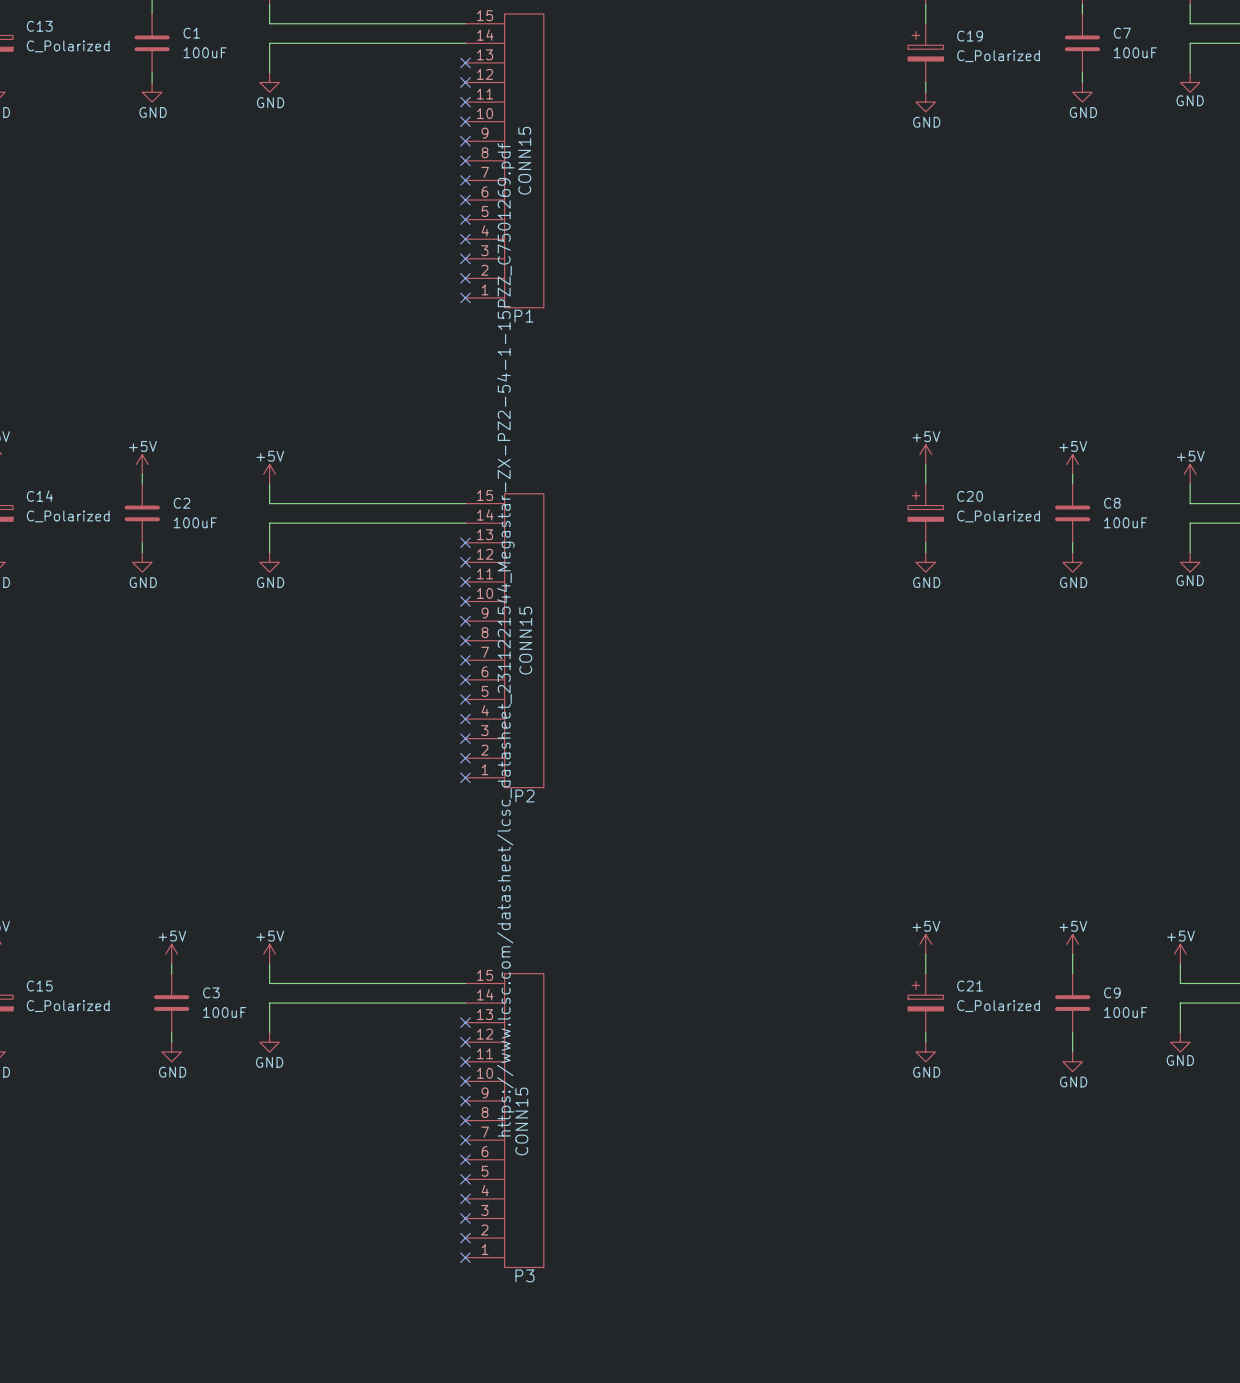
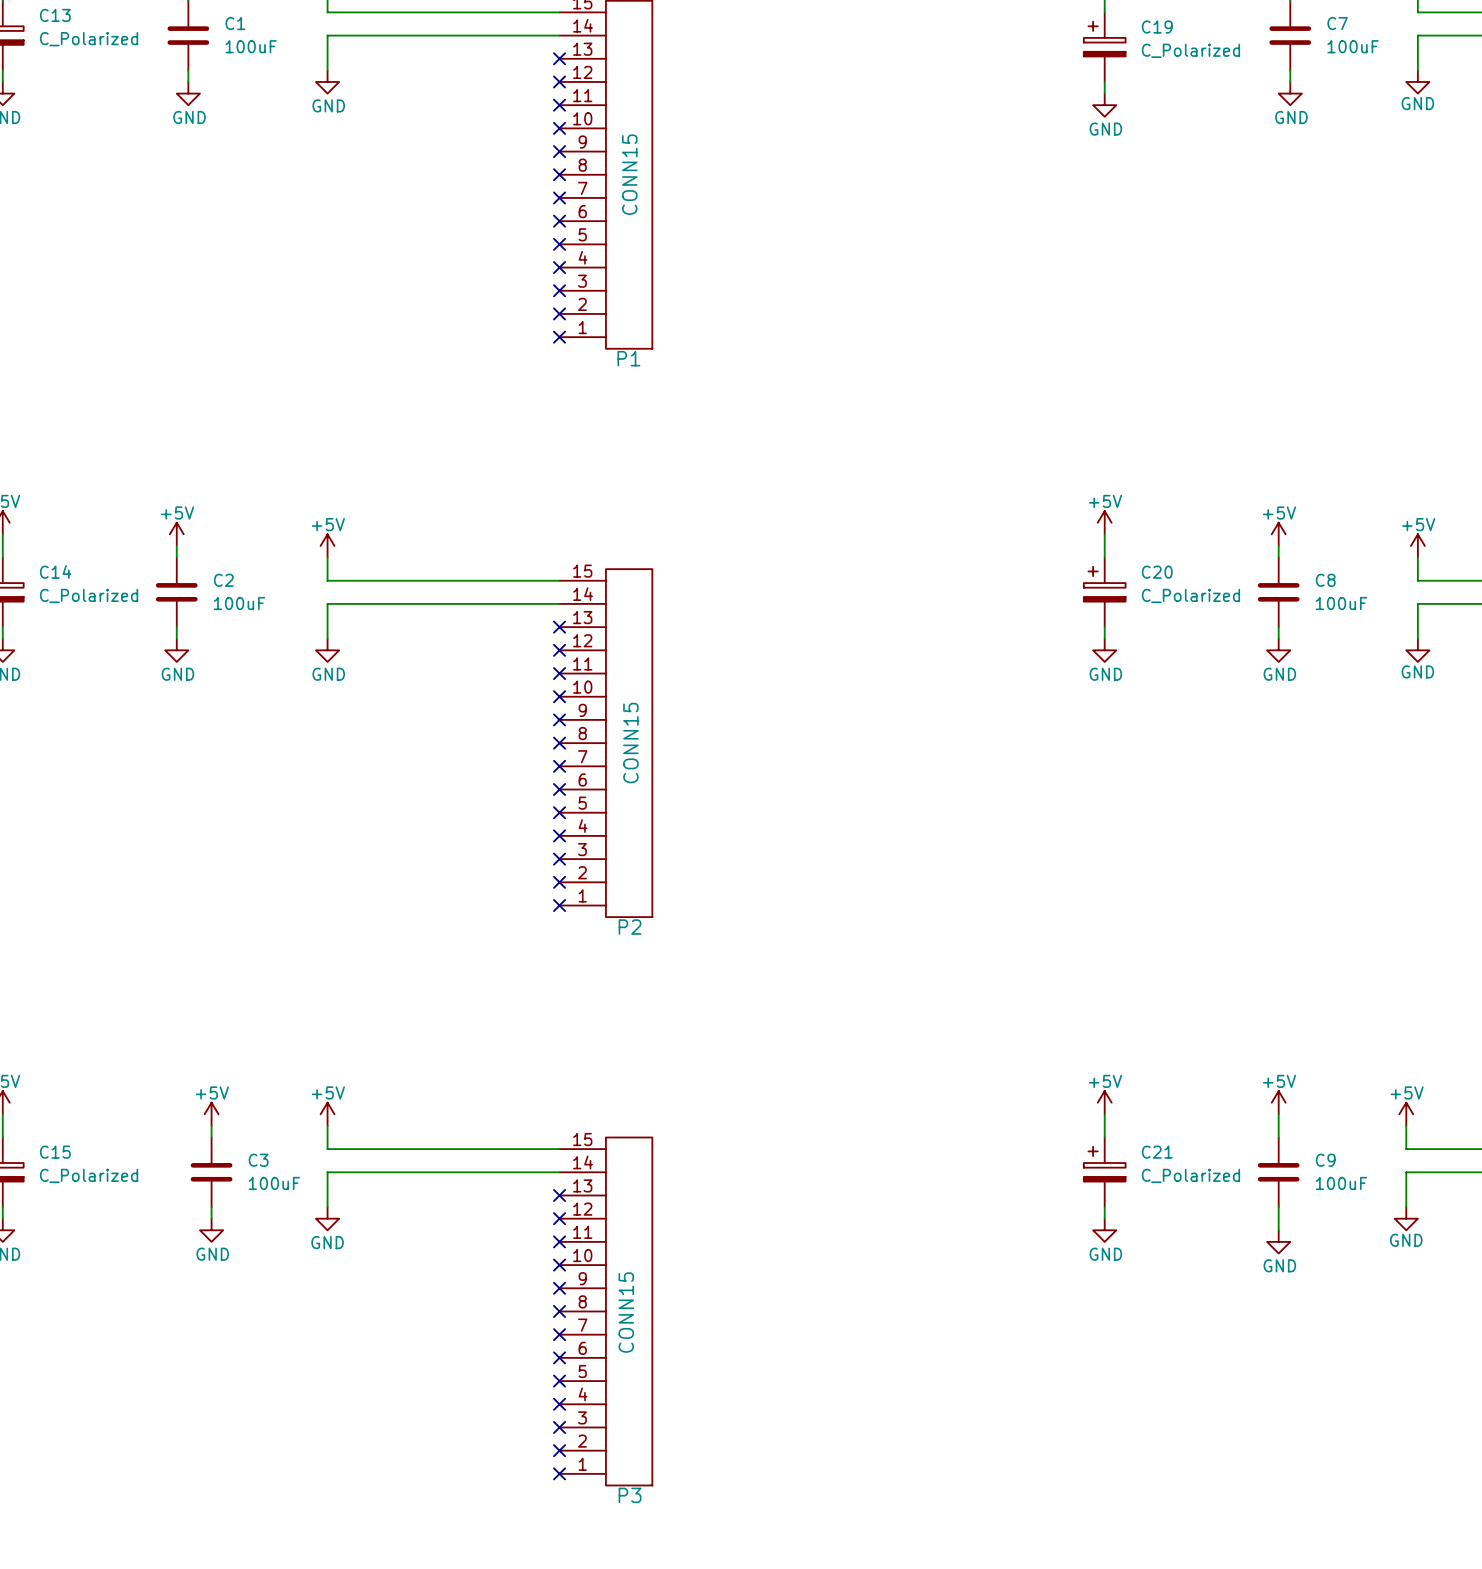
P2 text: https://www.lcsc.com/datasheet/lcsc_datasheet_2311221544_Megastar-ZX-PZ2-54-1-15PZZ_C7501269.pdf (505, 639) -> none

